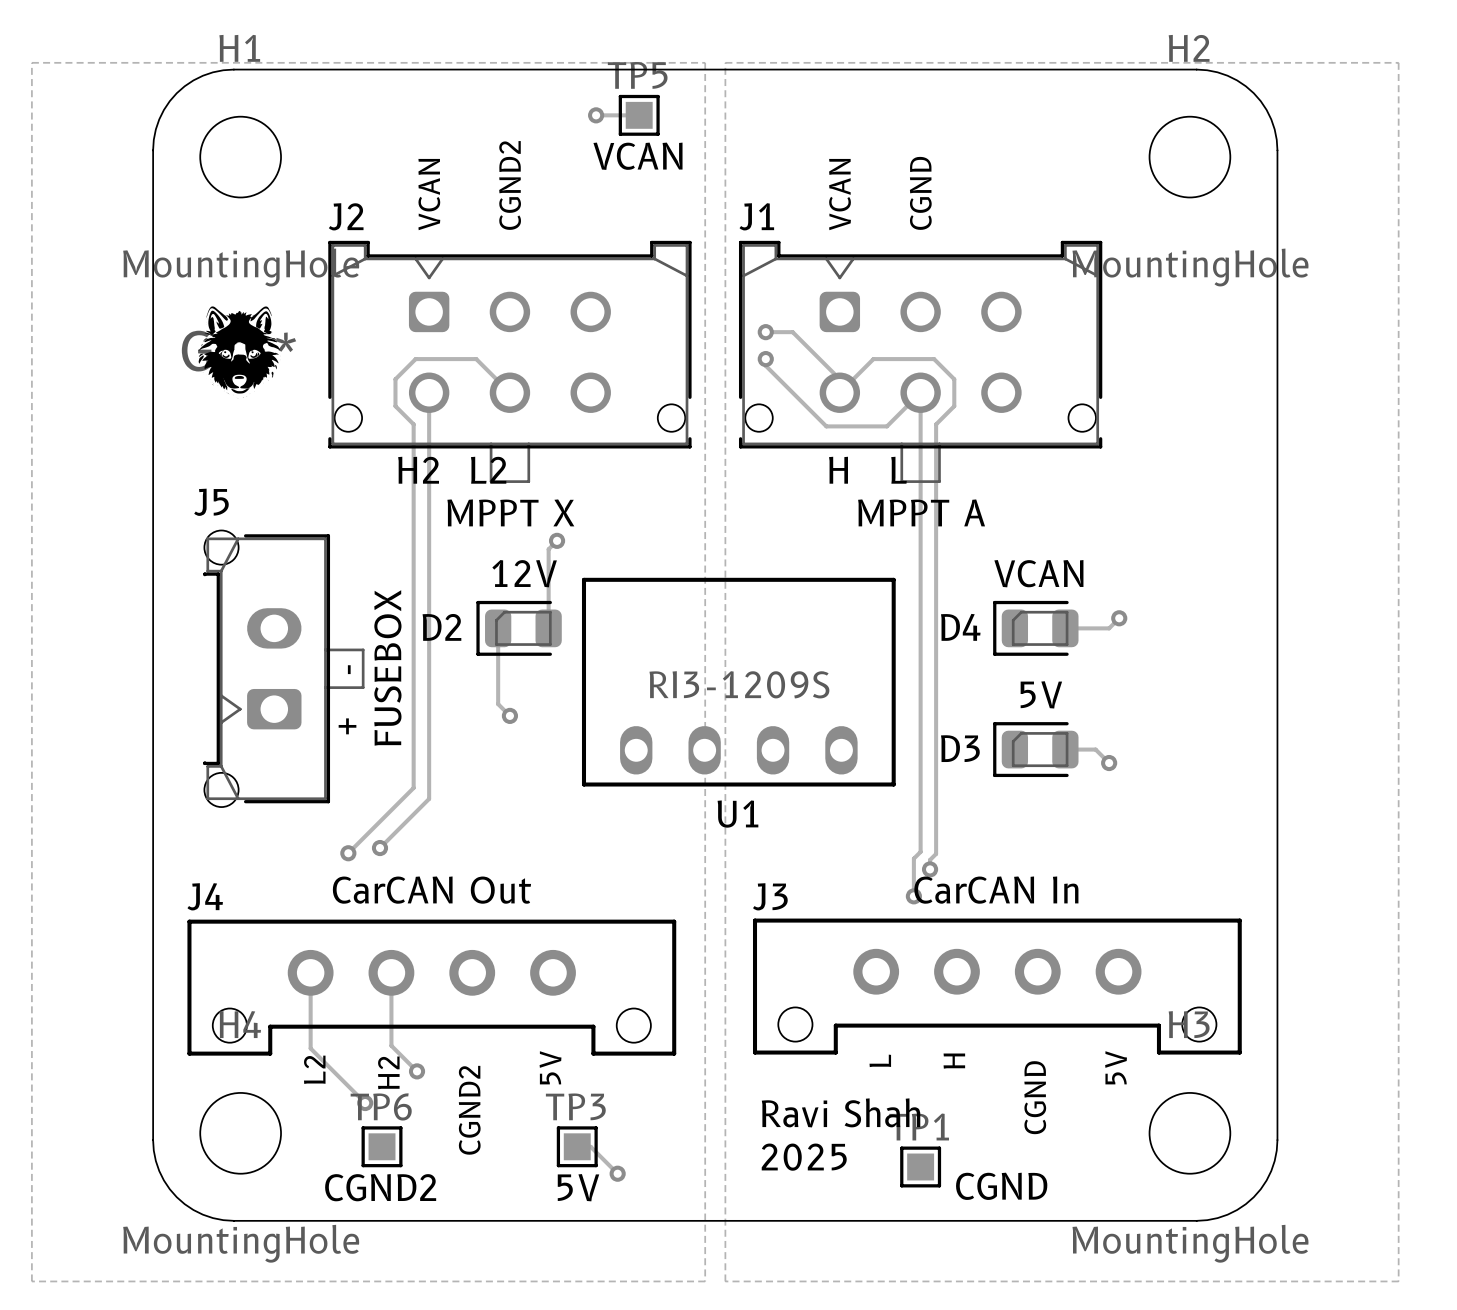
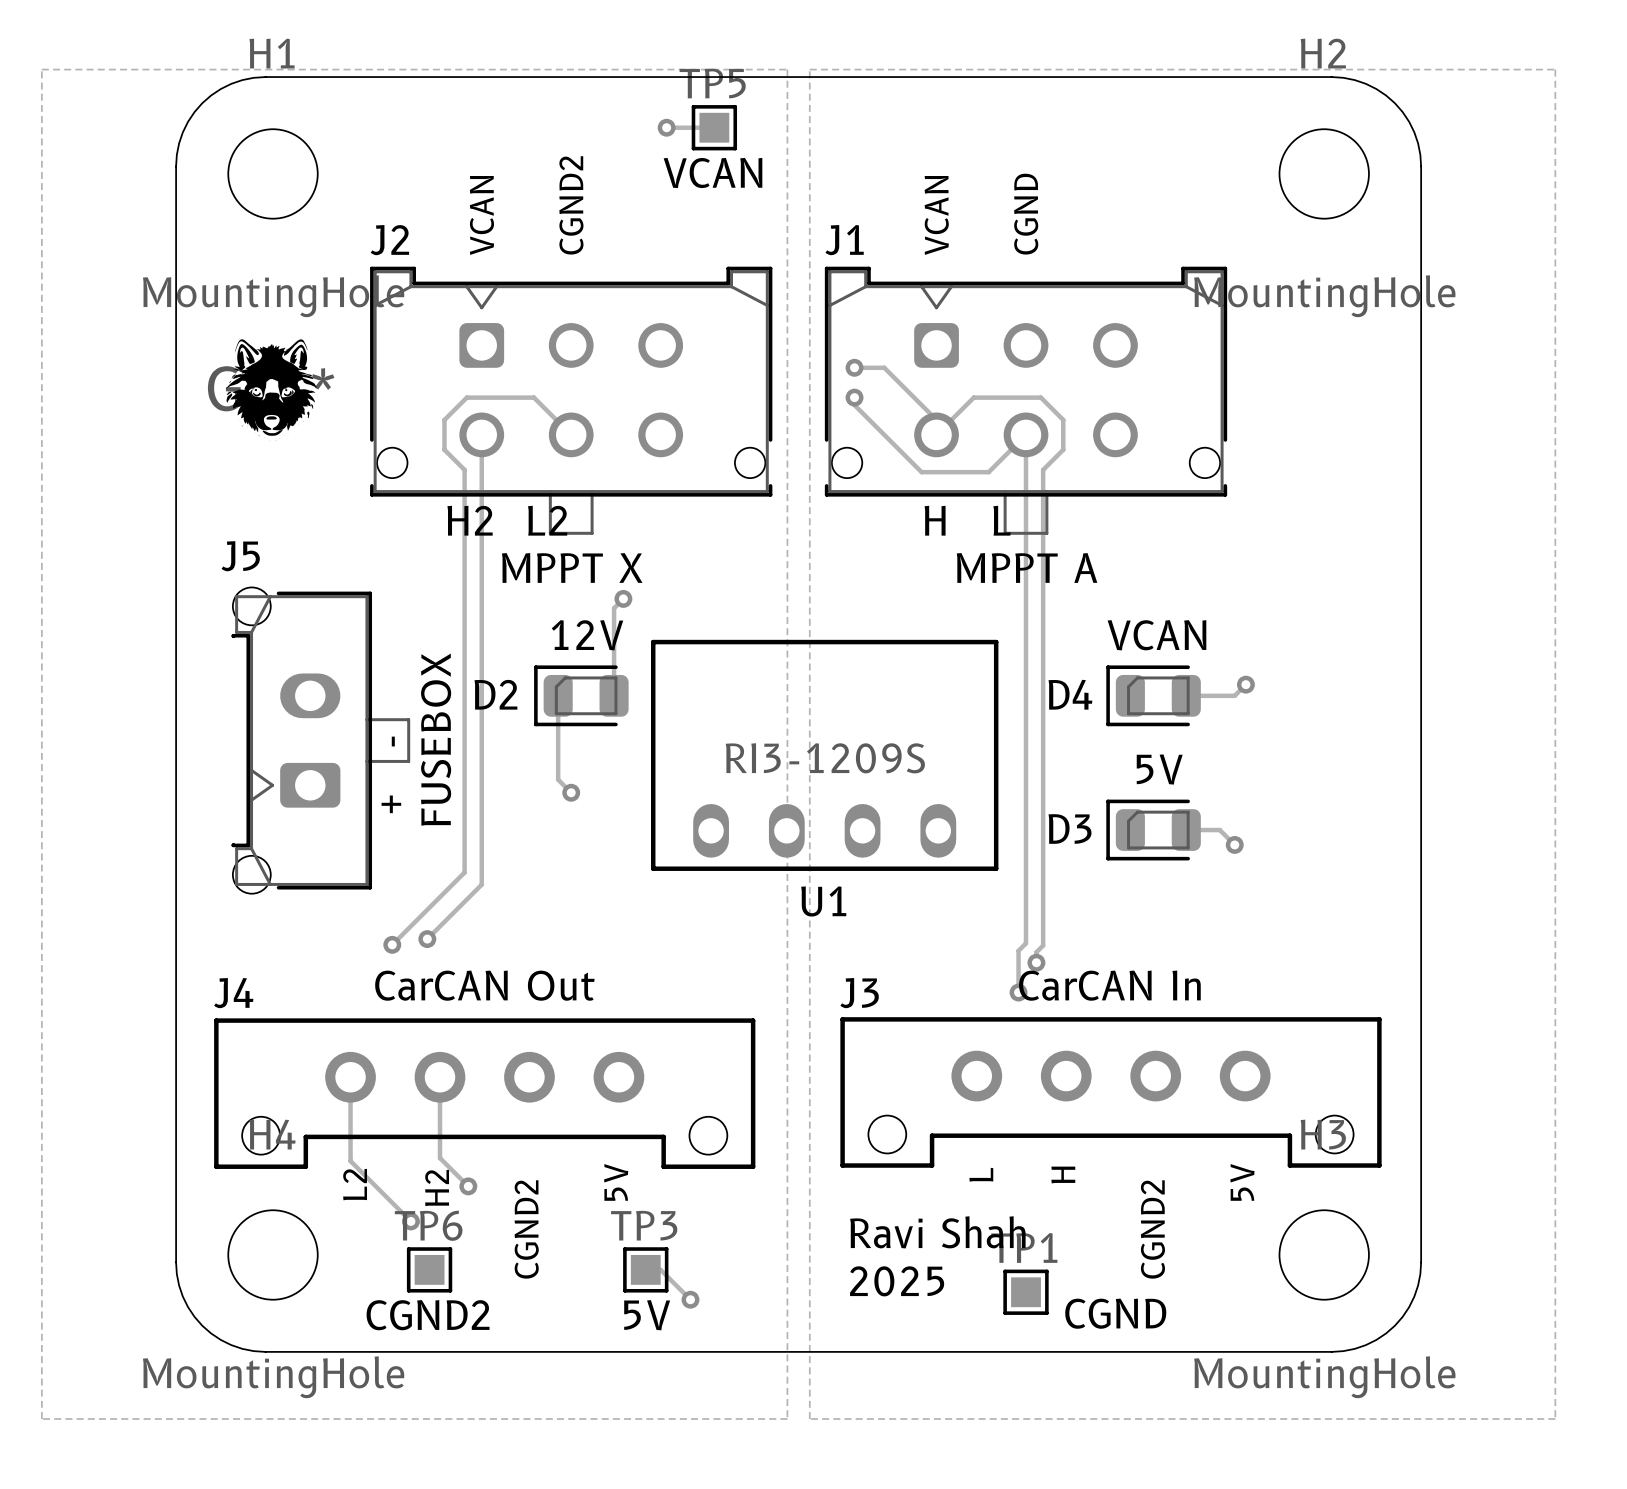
text: CGND (1035, 1097) -> CGND2 (1152, 1229)

